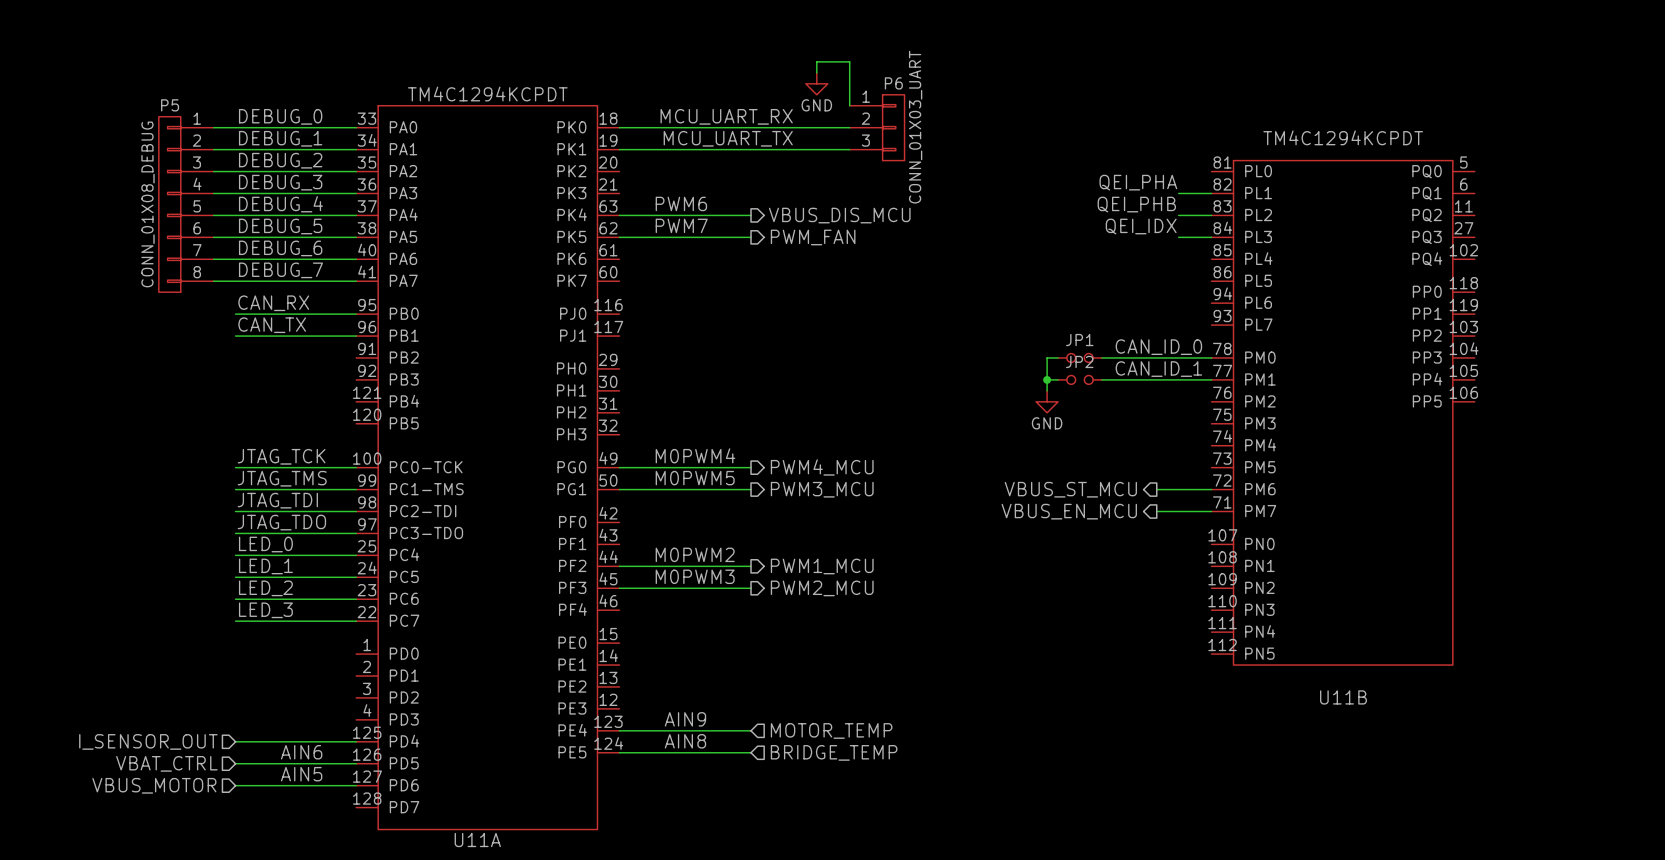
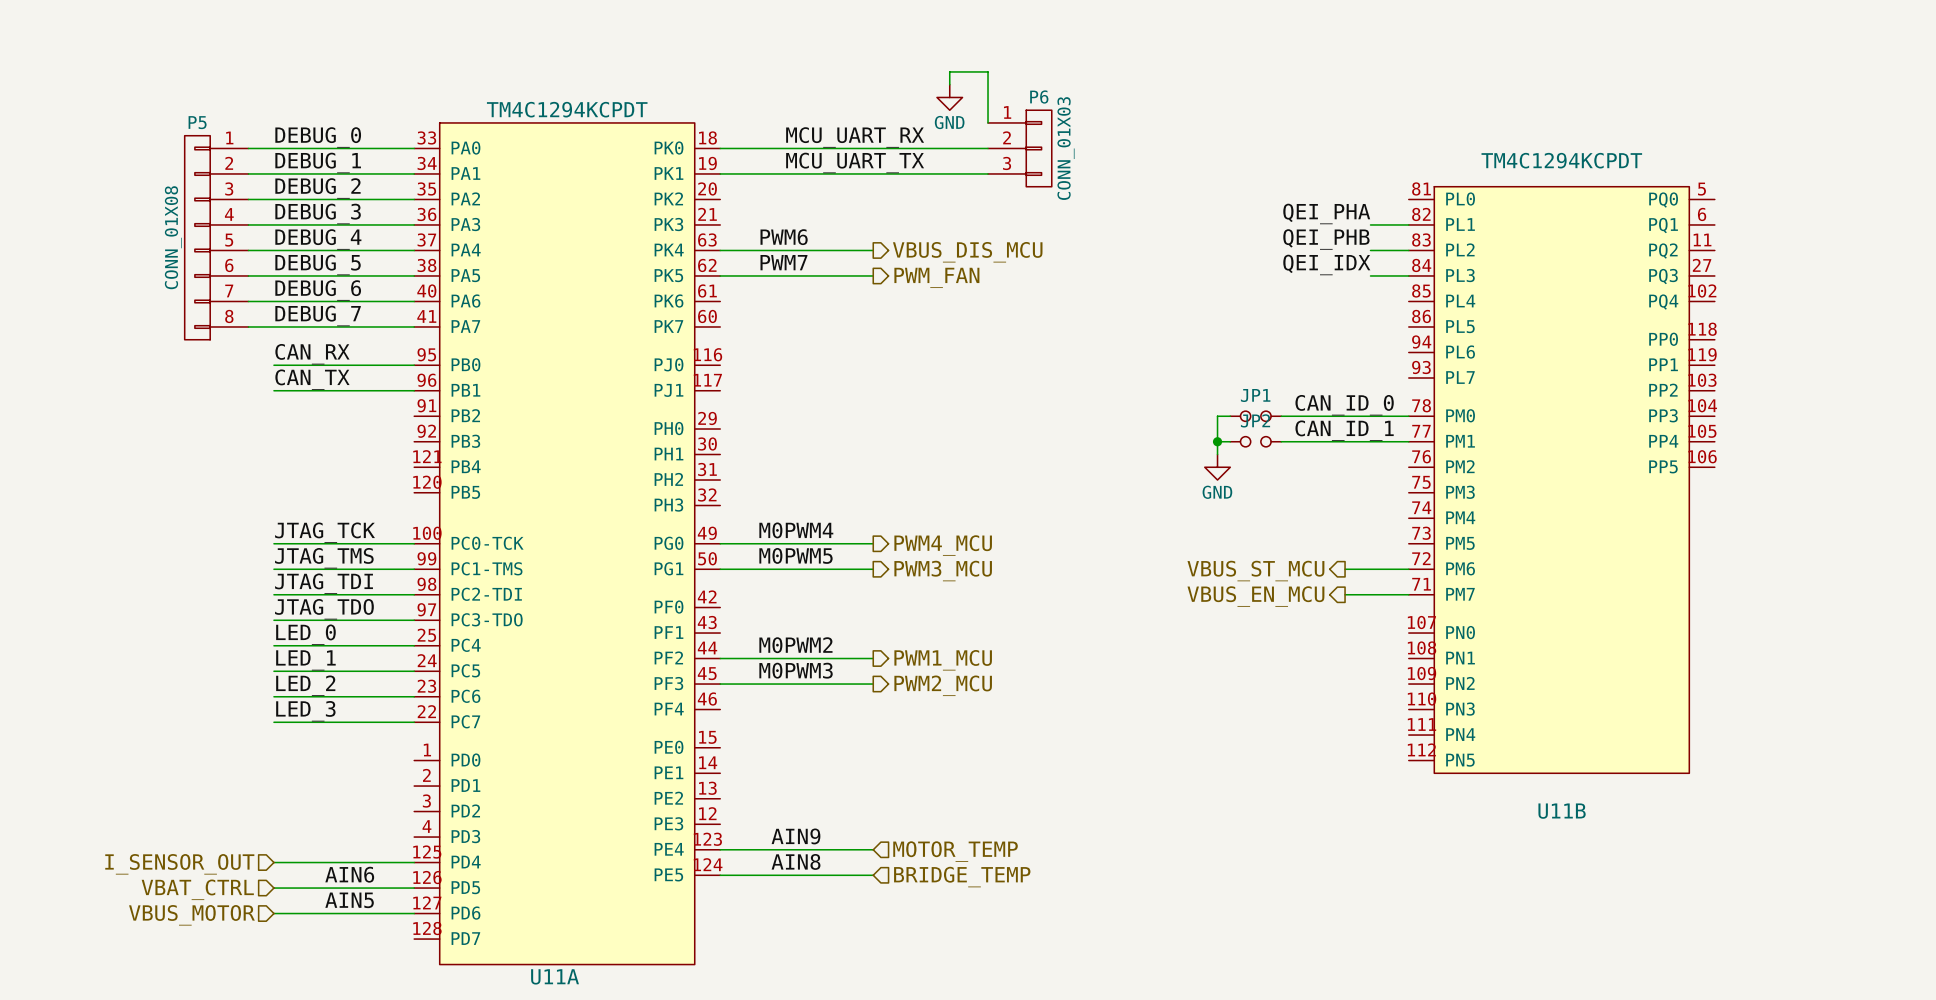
P6 value: CONN_01X03_UART (915, 127) -> CONN_01X03 (1065, 148)
P5 value: CONN_01X08_DEBUG (147, 204) -> CONN_01X08 (173, 237)

